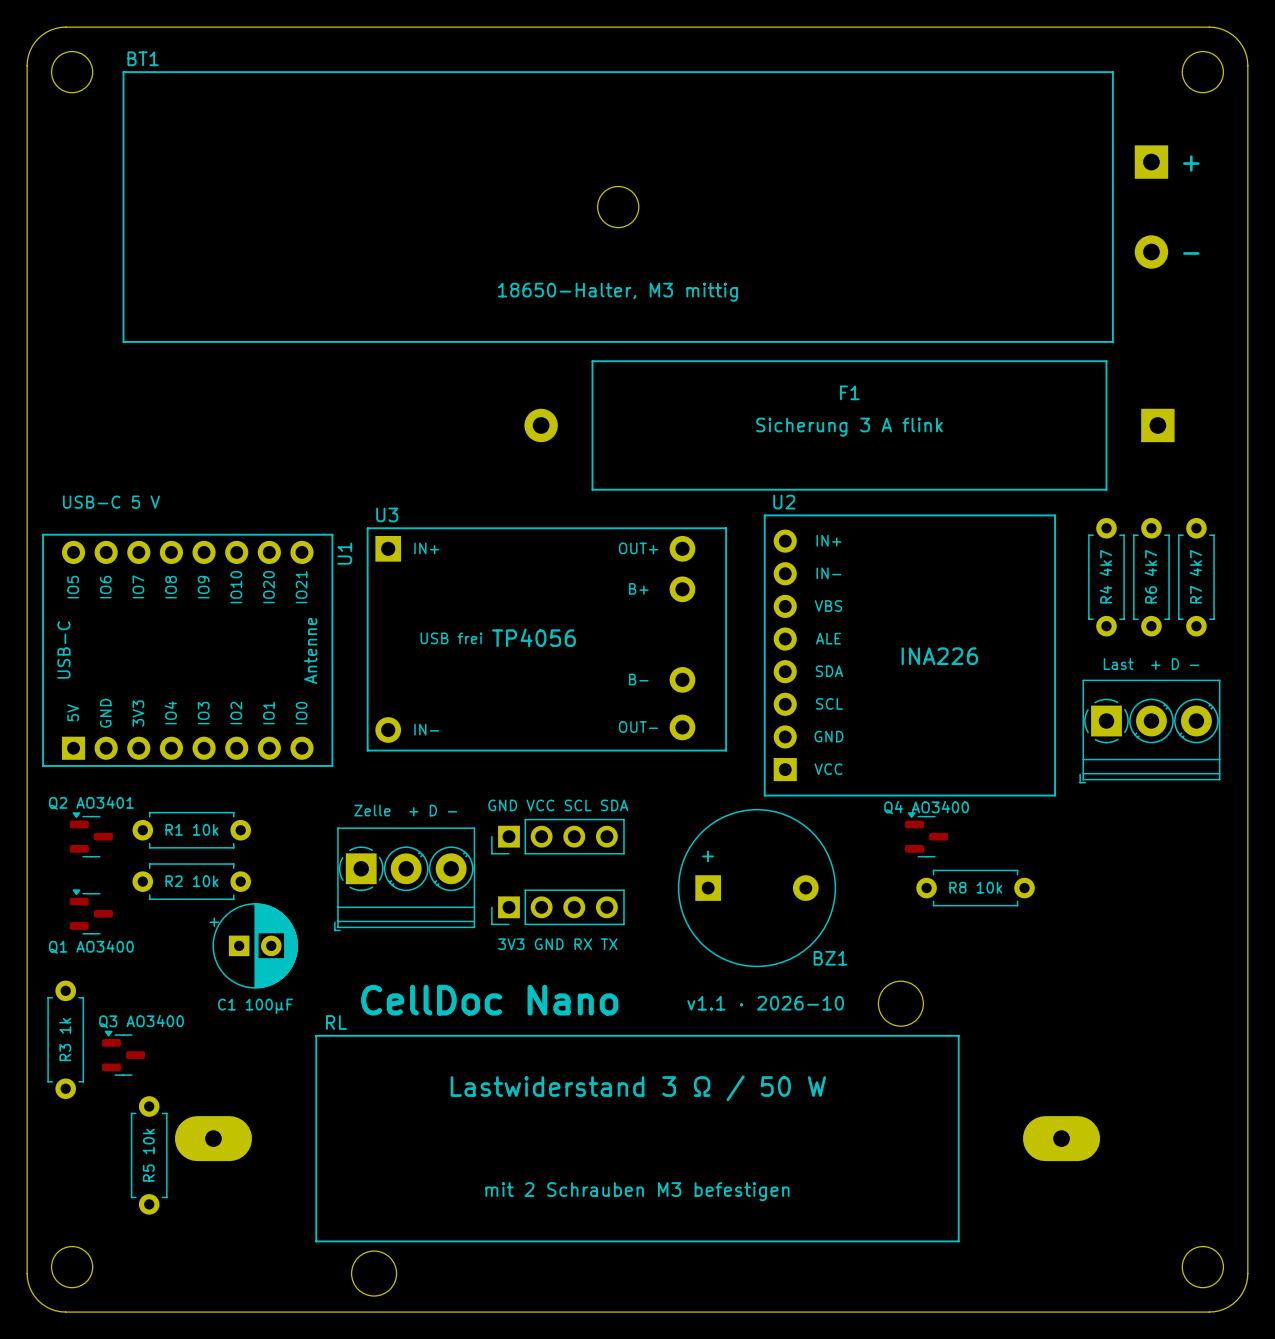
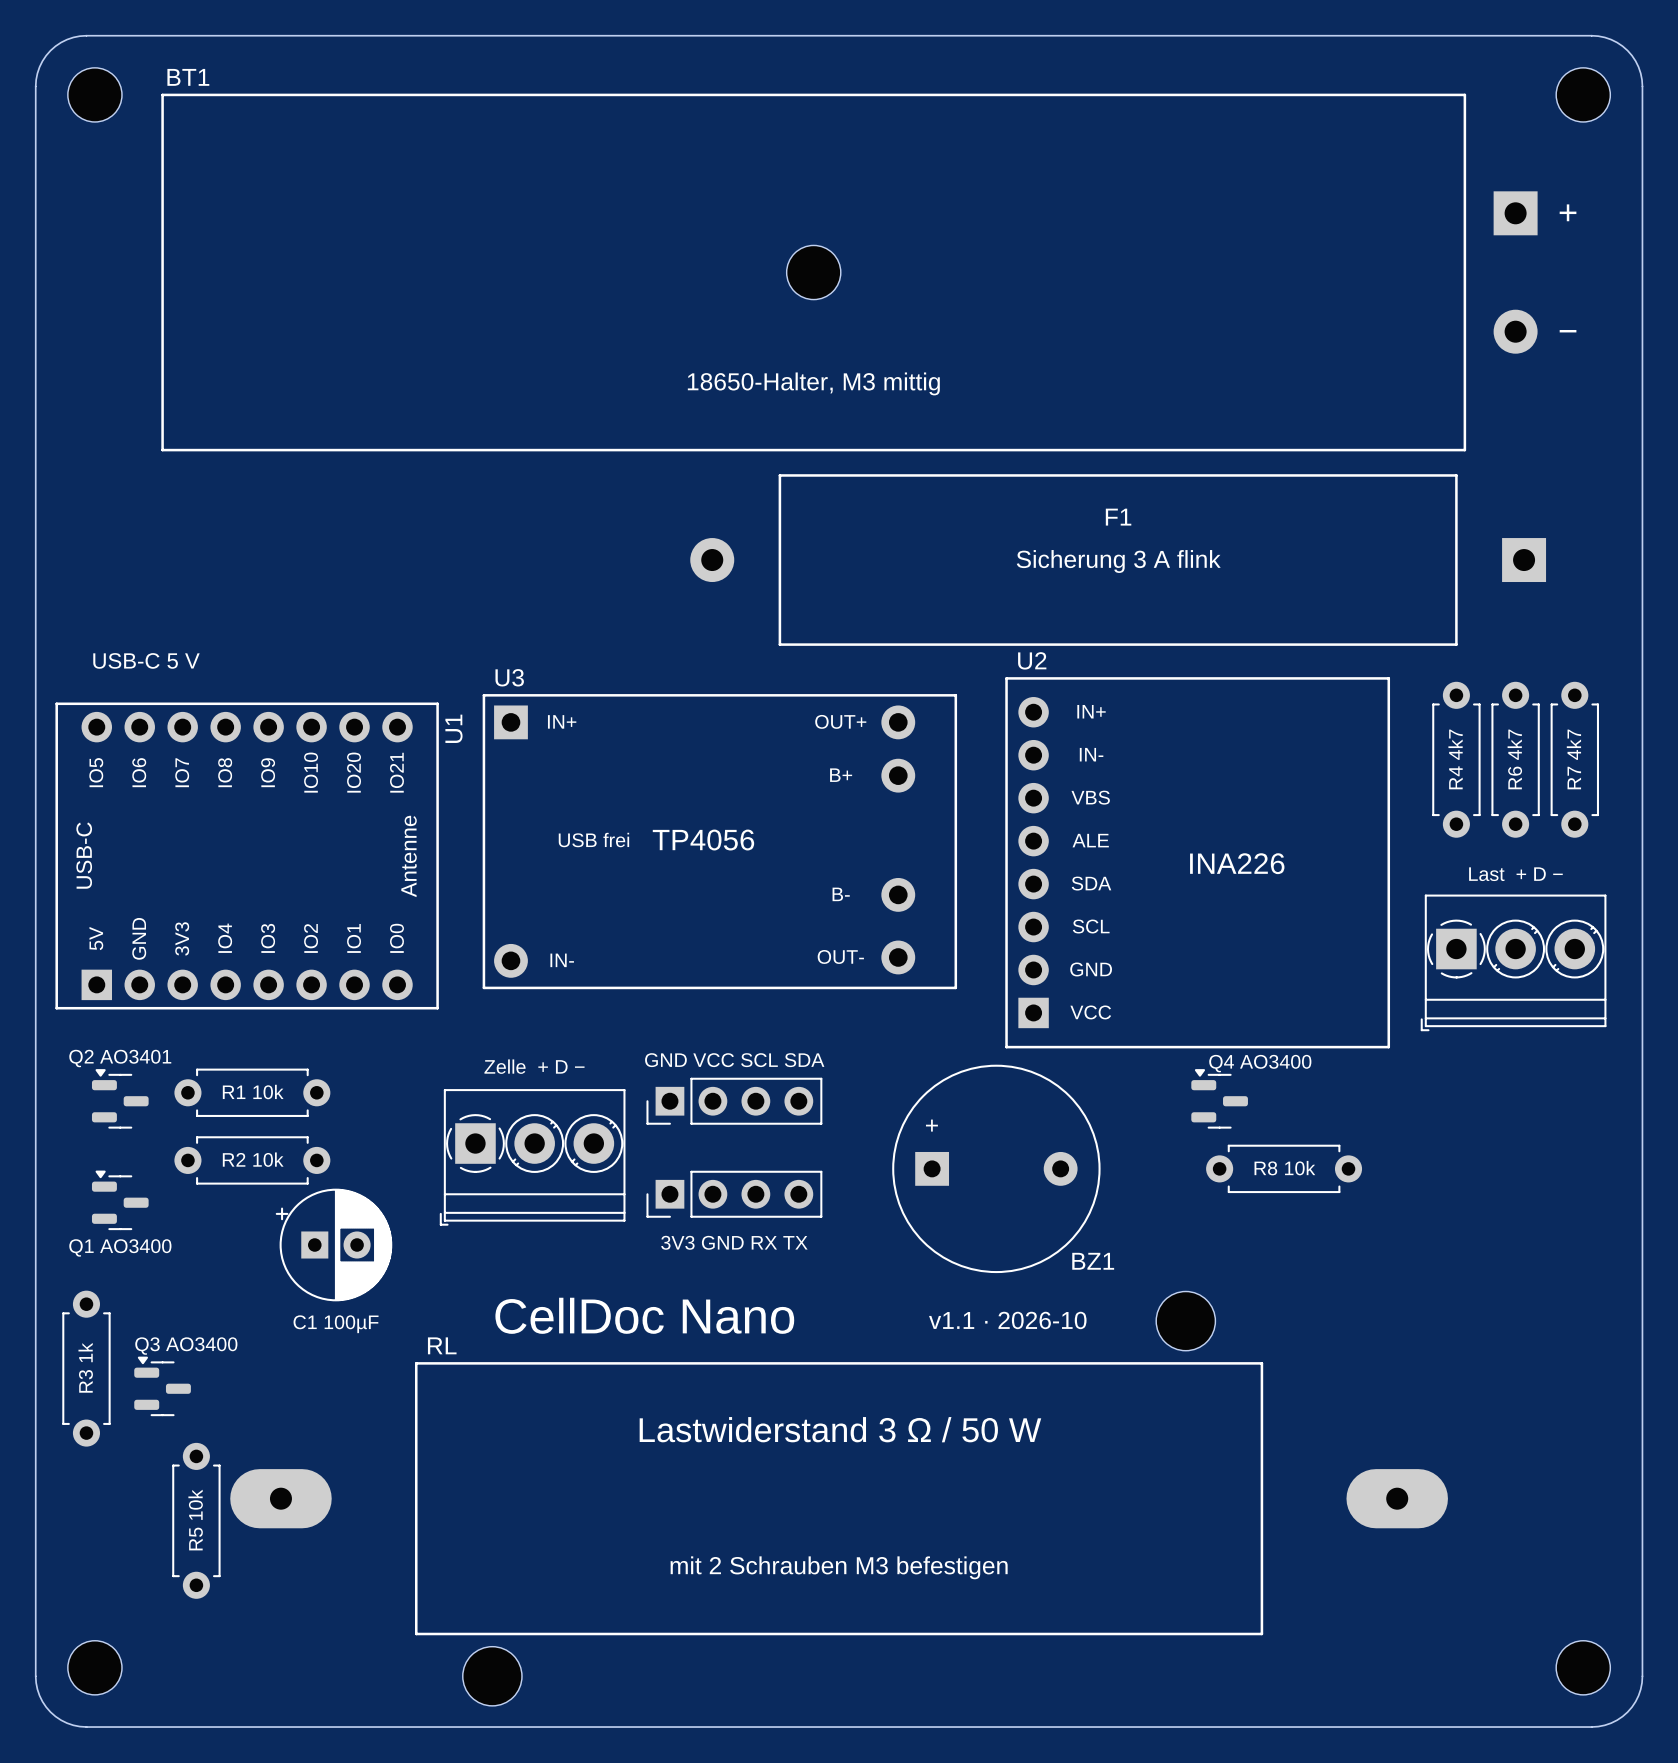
part text position: Q4 AO3400 (926, 807) -> Q4 AO3400 (1260, 1063)

